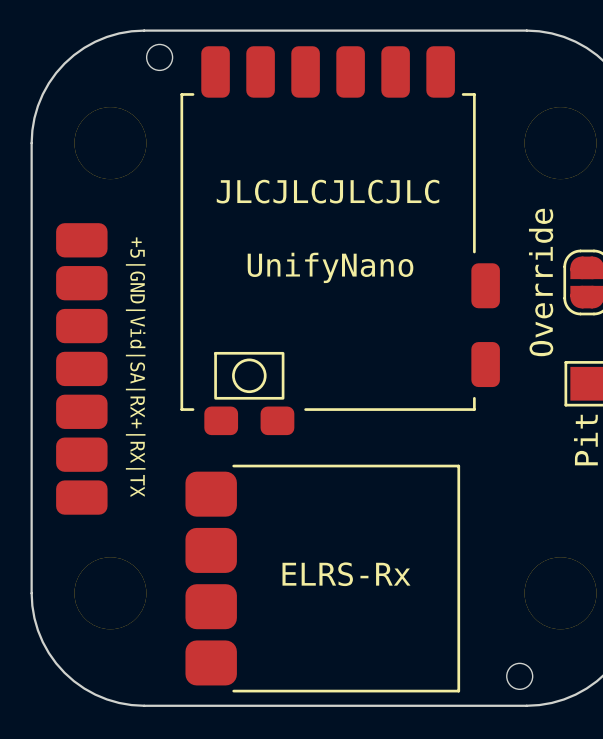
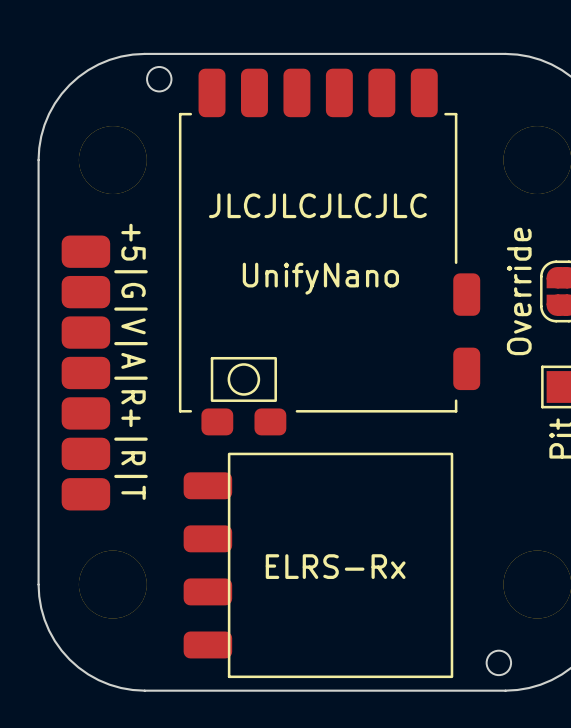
text: +5|GND|Vid|SA|RX+|RX|TX (135, 367) -> +5|G|V|A|R+|R|T (130, 361)
part footprint: [185, 464, 461, 693] -> [183, 452, 454, 679]

